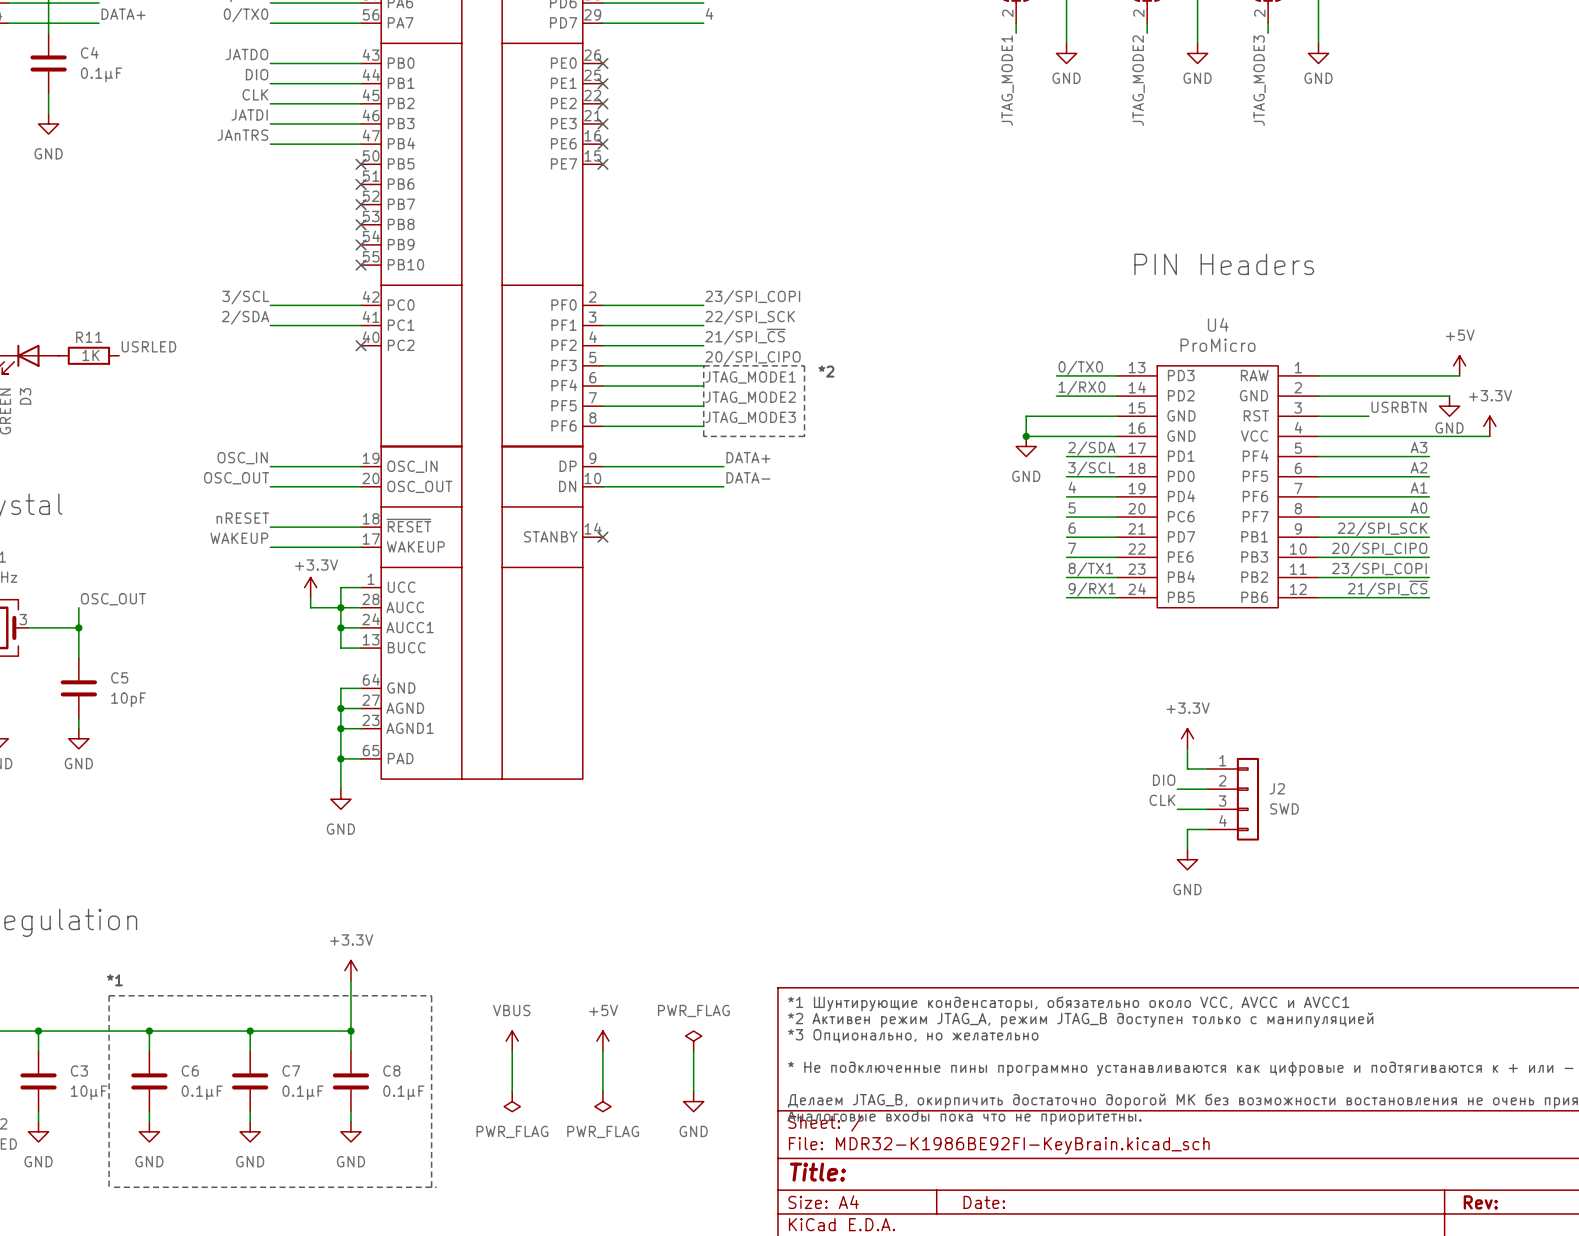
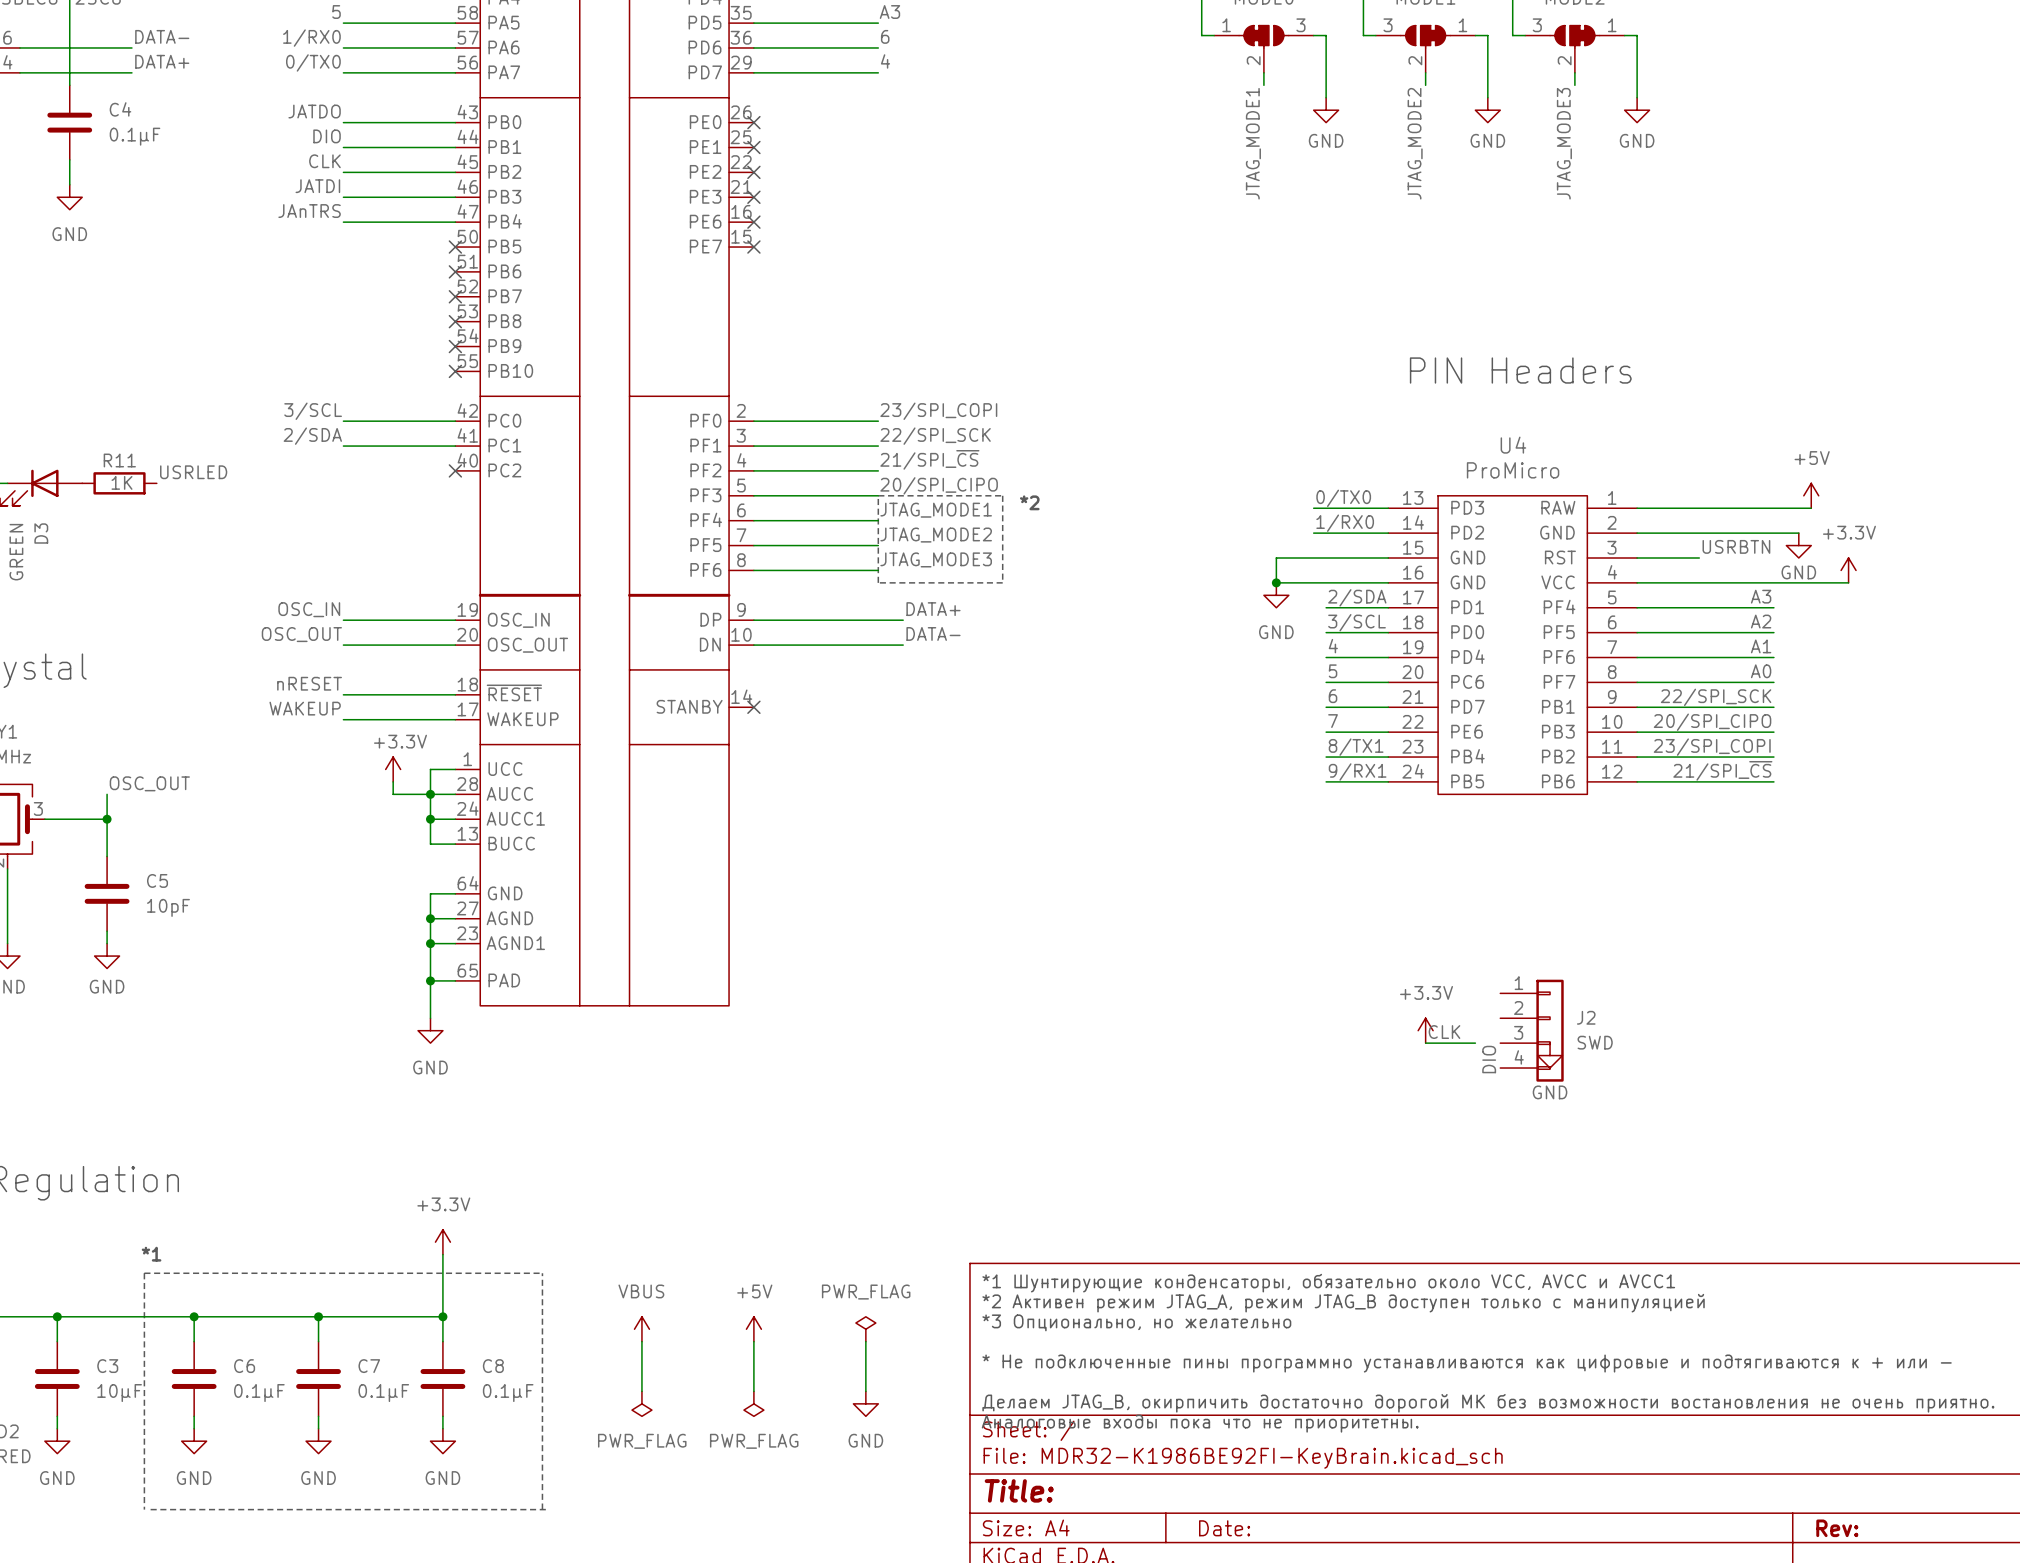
power symbol position: +3.3V (1187, 738) -> +3.3V (1425, 1030)
wire: (1187, 748) (1187, 769) (1207, 769) -> none
label rotation: 0° (1164, 780) -> 90° counterclockwise (1489, 1059)
label position: DIO (1164, 780) -> DIO (1489, 1059)
wire: (1177, 789) (1207, 789) -> (1425, 1043) (1462, 1043)
wire: (1187, 809) (1207, 809) -> none
wire: (1207, 829) (1187, 829) (1187, 849) -> none
power symbol position: GND (1187, 859) -> GND (1550, 1055)

